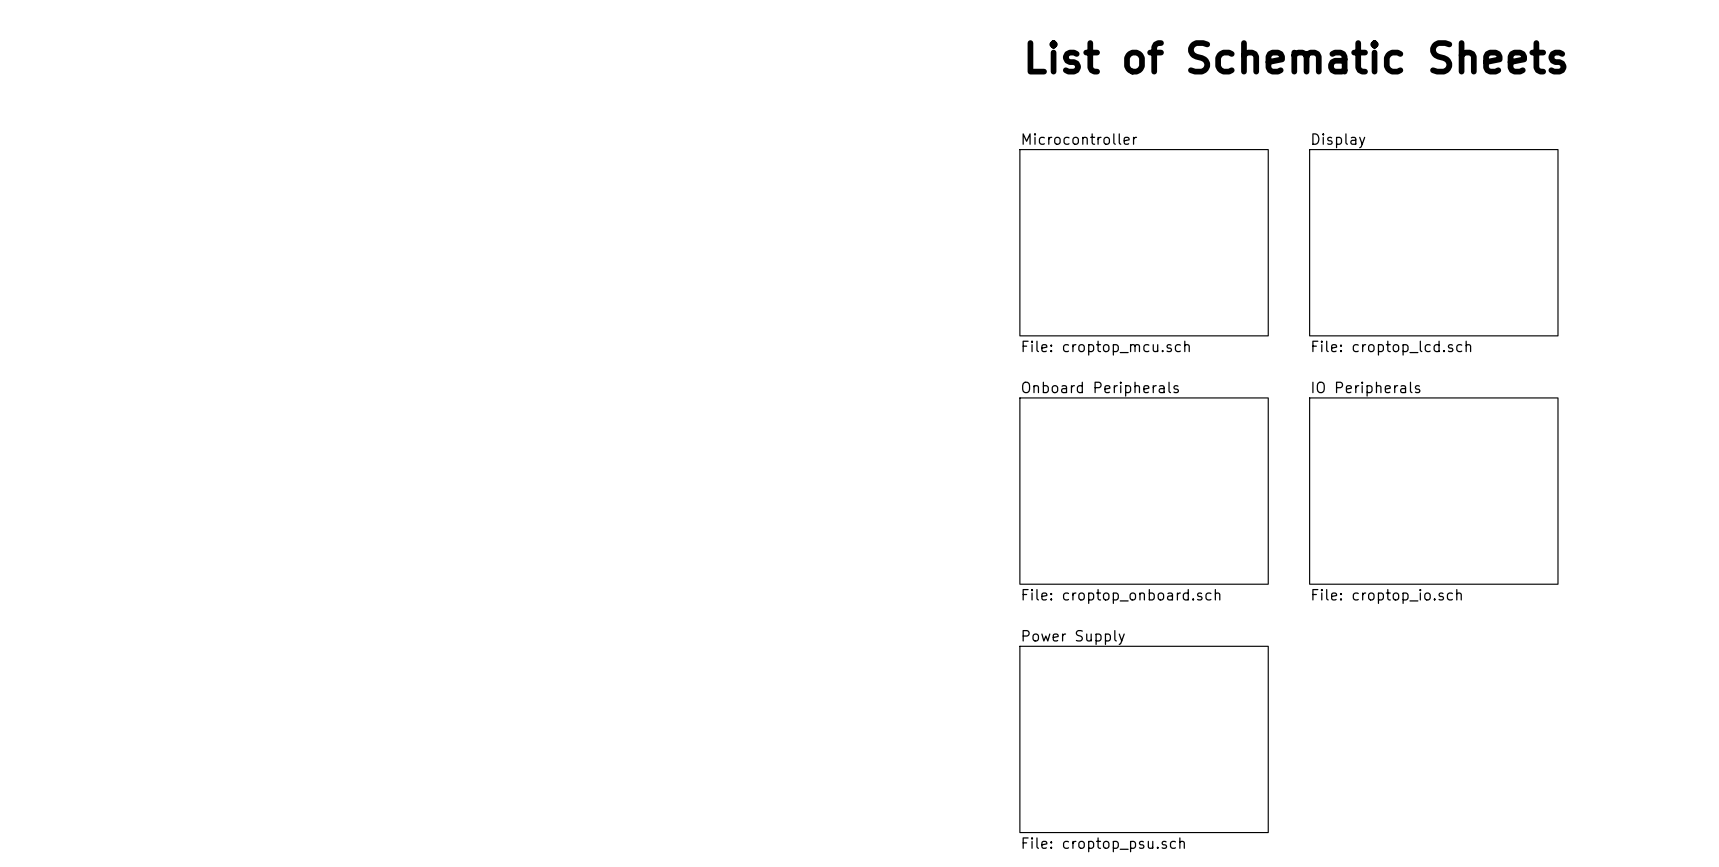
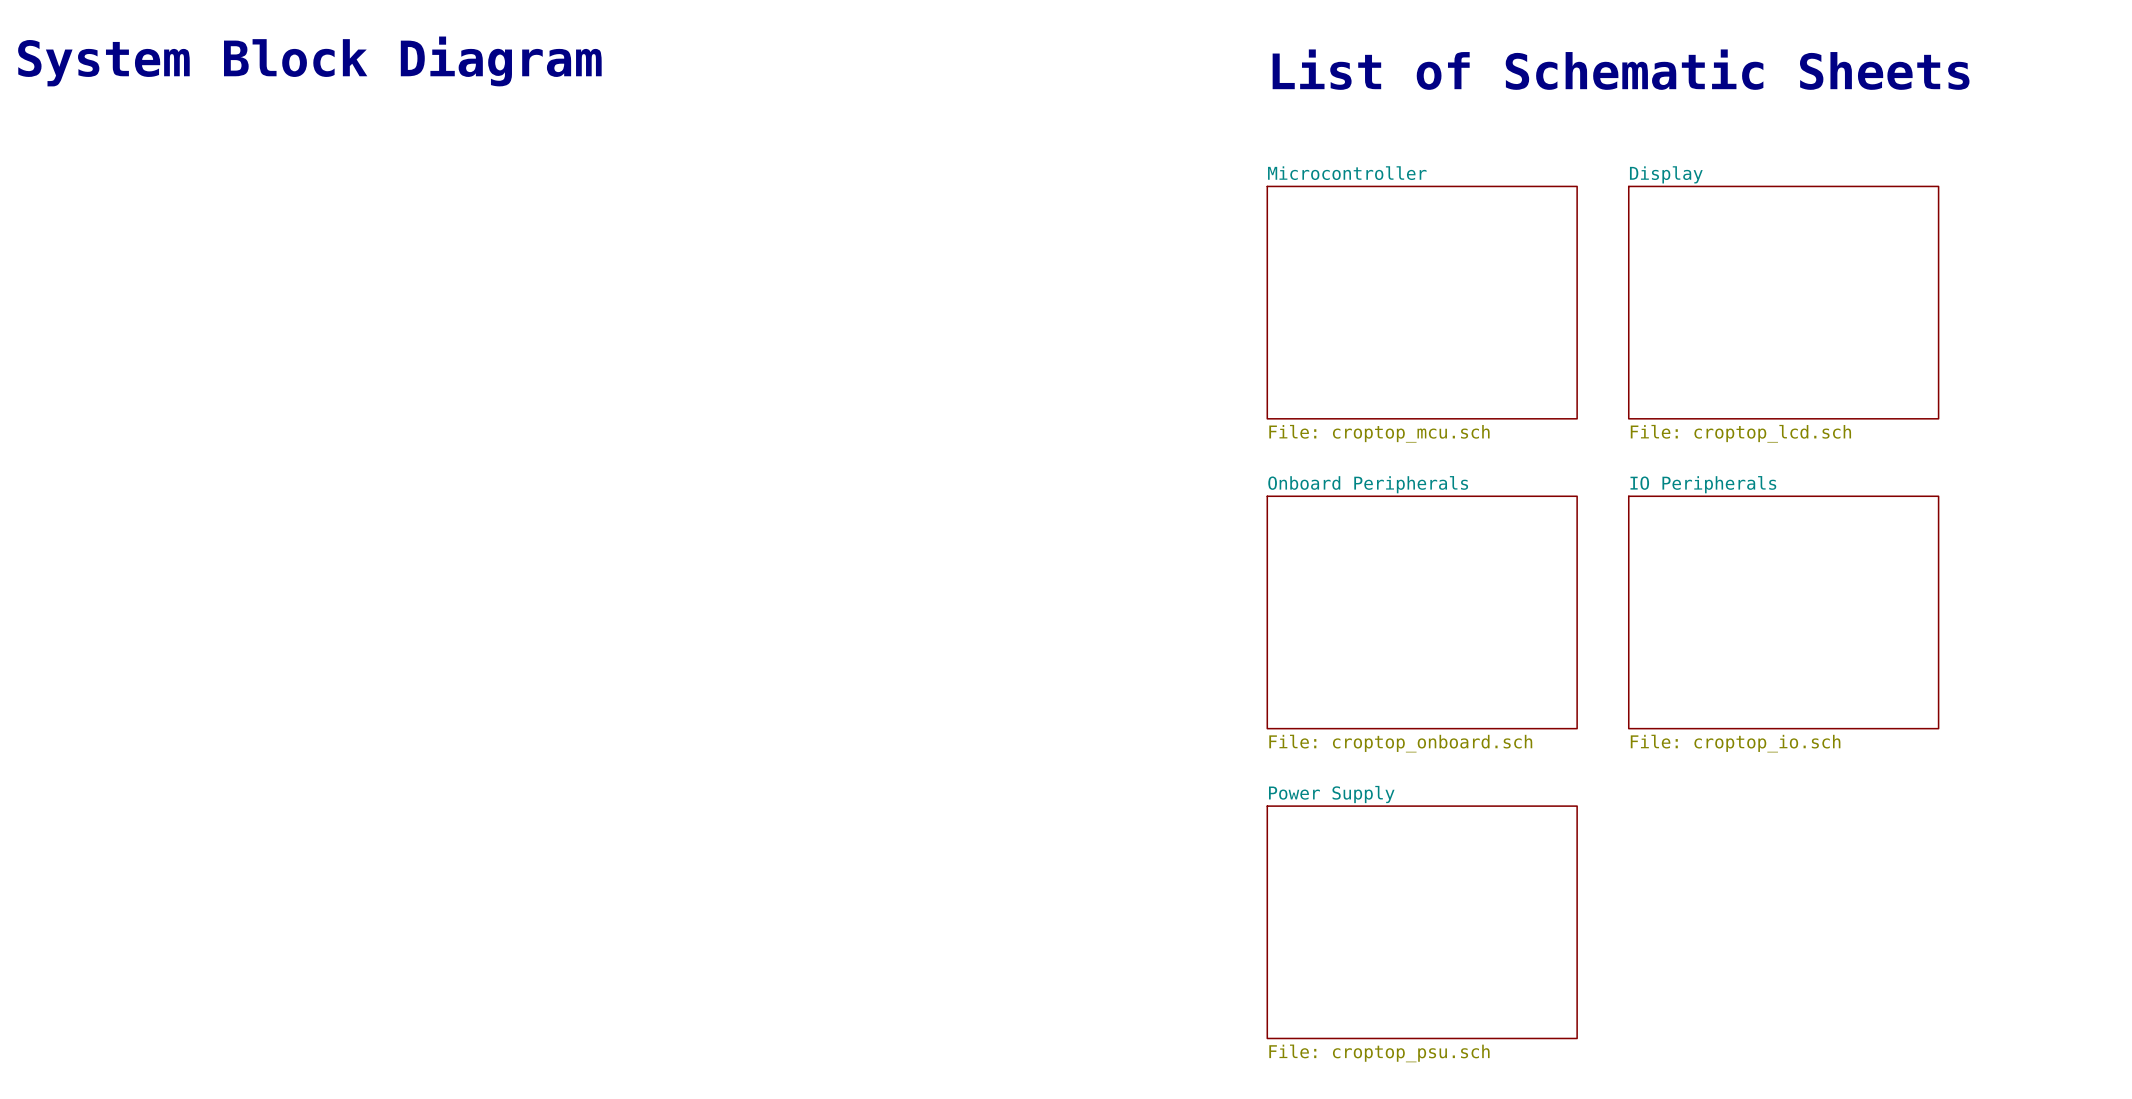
text: none -> System Block Diagram (309, 61)

